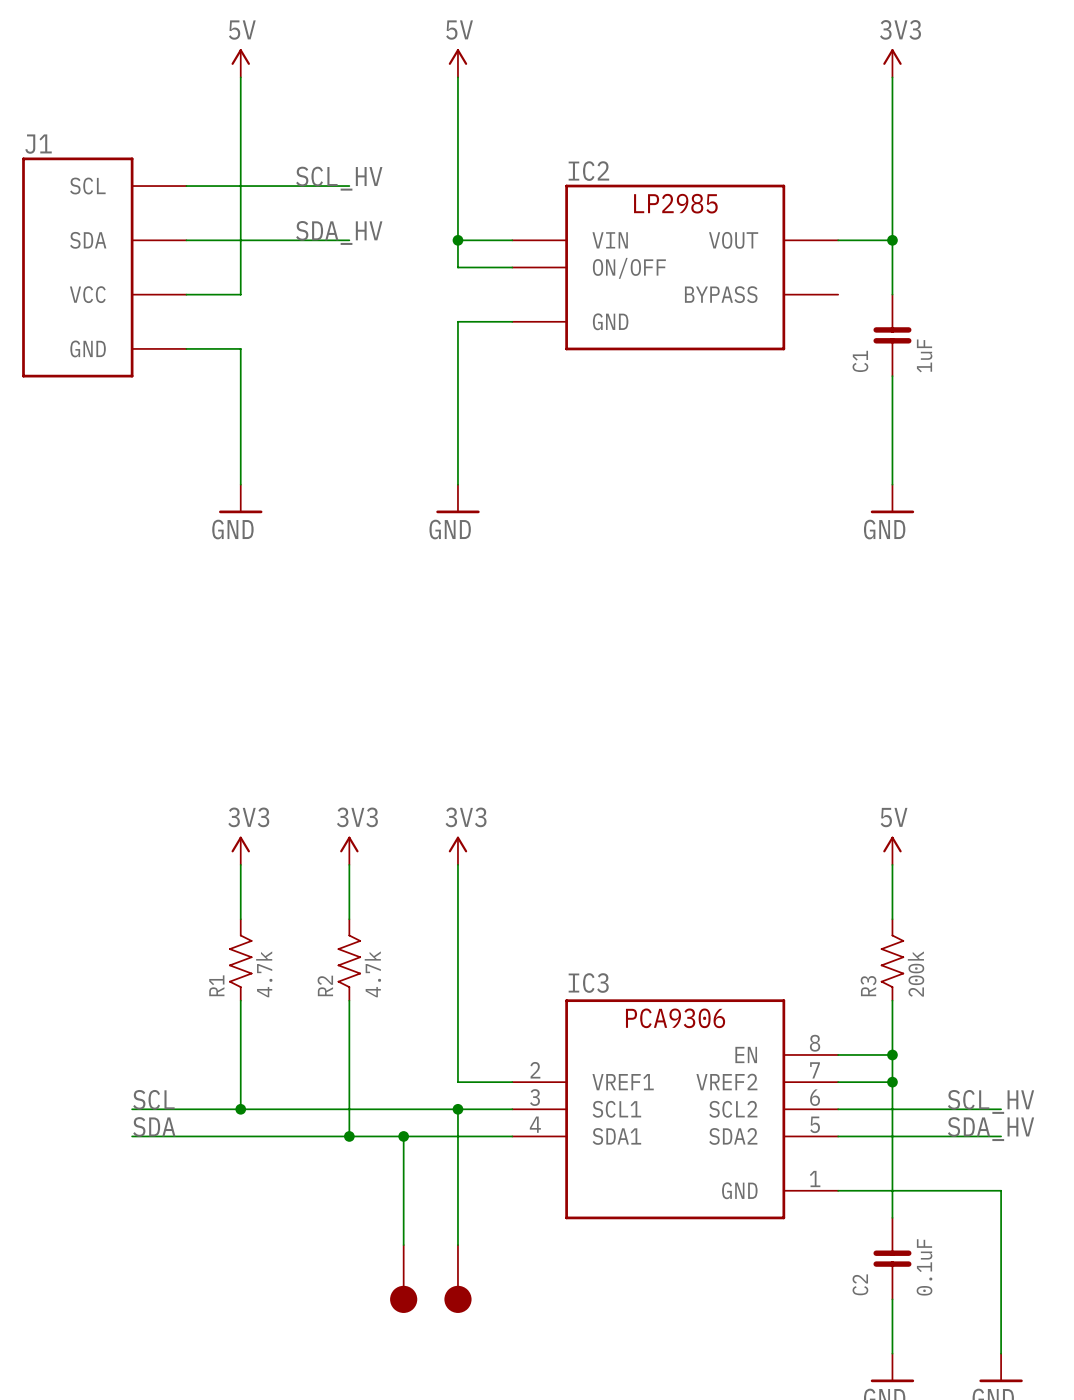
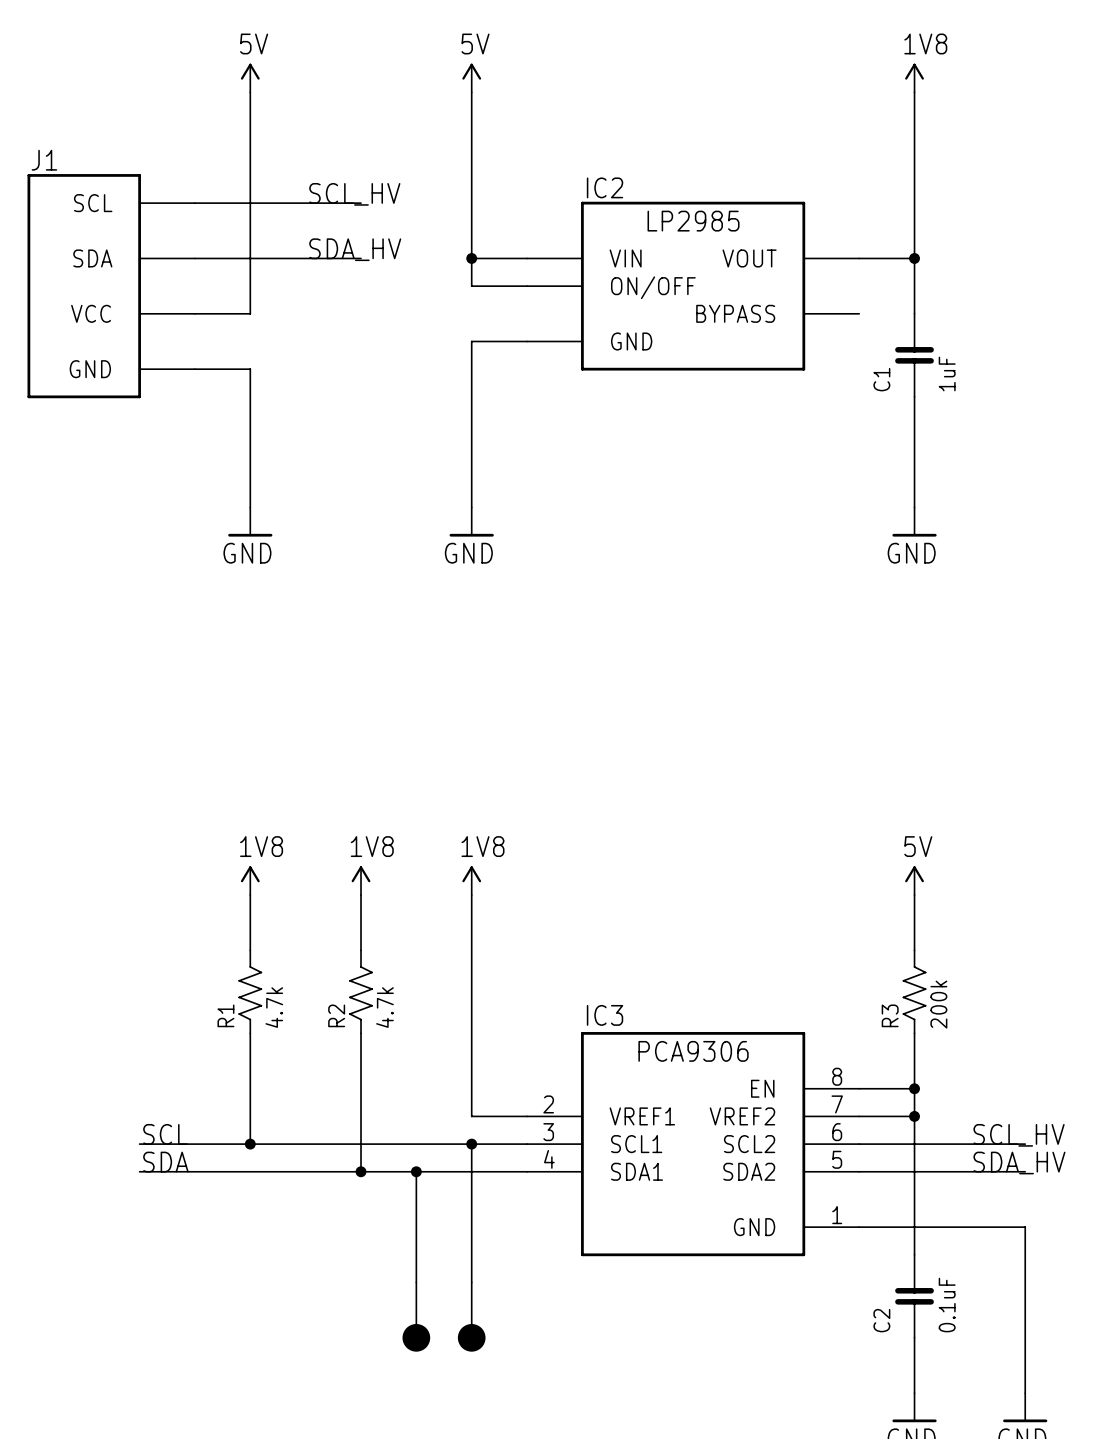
power symbol: 3V3 (892, 63) -> 1V8 (914, 78)
power symbol: 3V3 (240, 850) -> 1V8 (250, 880)
power symbol: 3V3 (349, 850) -> 1V8 (361, 880)
power symbol: 3V3 (457, 850) -> 1V8 (471, 880)

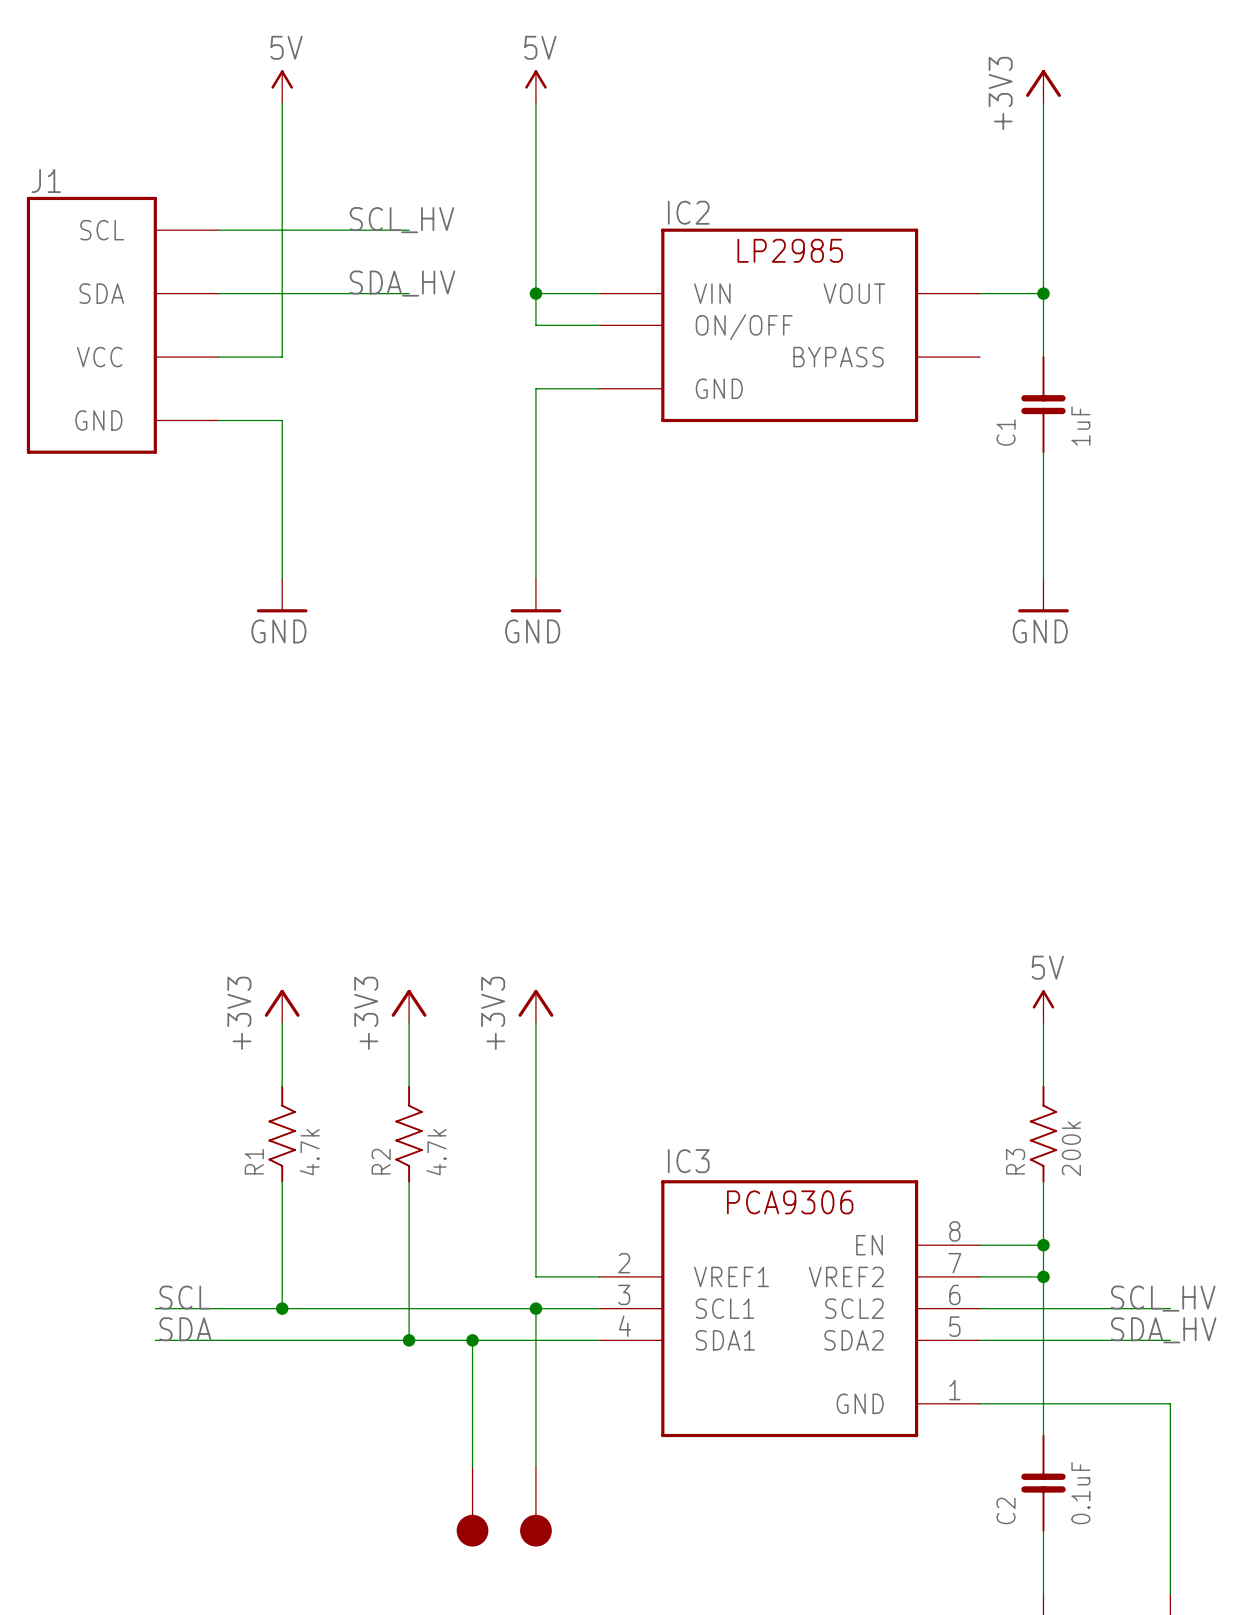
power symbol: 1V8 (914, 78) -> +3V3 (1043, 86)
power symbol: 1V8 (250, 880) -> +3V3 (282, 1006)
power symbol: 1V8 (361, 880) -> +3V3 (409, 1006)
power symbol: 1V8 (471, 880) -> +3V3 (535, 1006)

